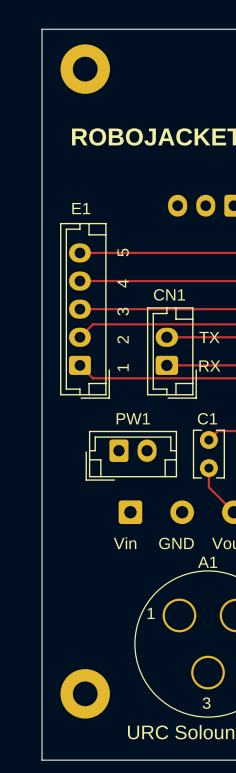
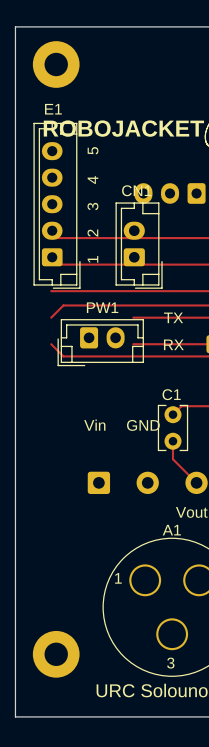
text position: 5 (123, 252) -> 5 (93, 150)
text position: 4 (123, 283) -> 4 (92, 180)
E1 position: (85, 310) -> (57, 205)
text position: 3 (123, 311) -> 3 (92, 206)
text position: 2 (123, 339) -> 2 (92, 233)
CN1 position: (171, 353) -> (139, 245)
text position: 1 (123, 367) -> 1 (92, 259)
text: none -> GND (143, 425)
PW1 position: (131, 455) -> (100, 342)
text position: Vin (125, 543) -> Vin (94, 425)
text: GND (176, 543) -> none

